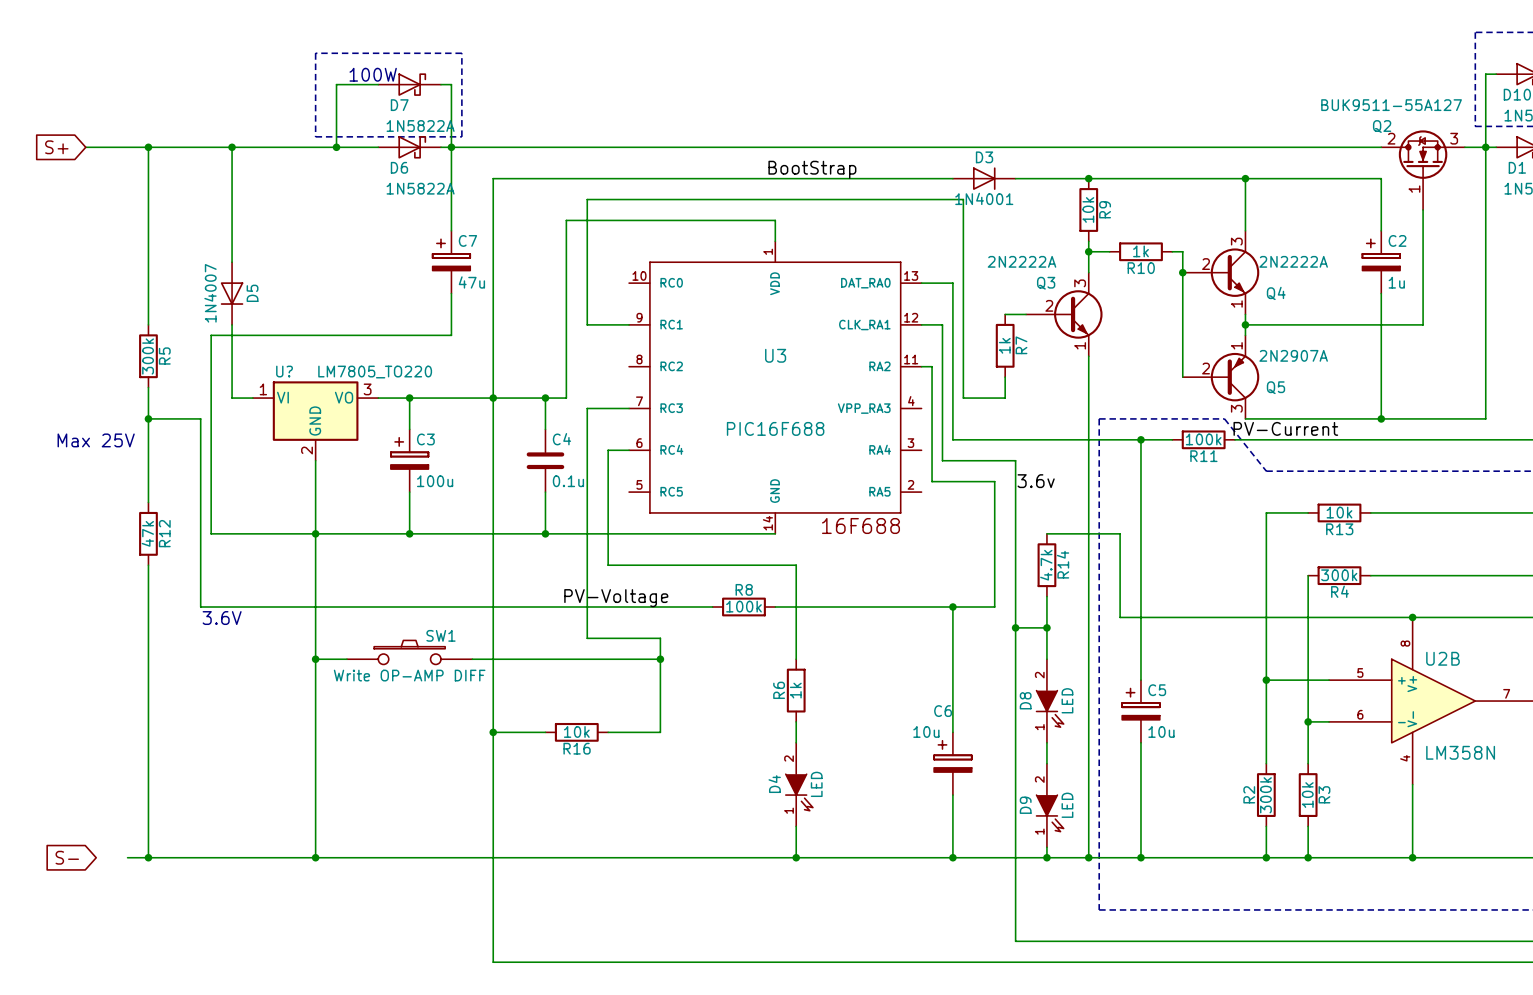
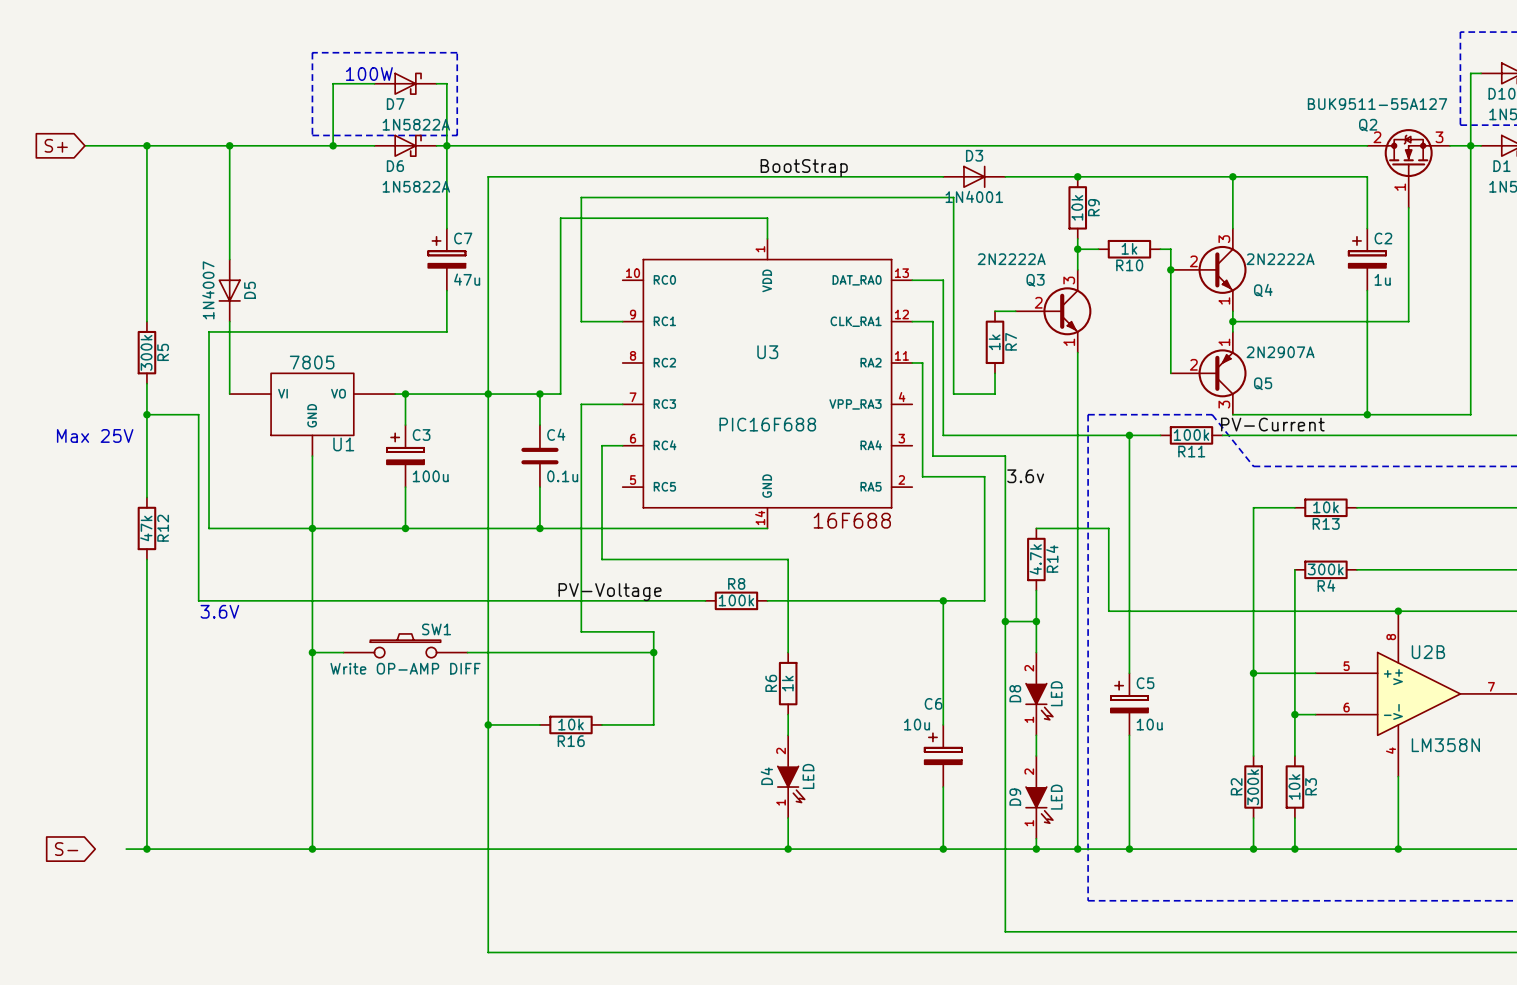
U1: none -> 7805 (312, 414)
U?: LM7805_TO220 (315, 421) -> none

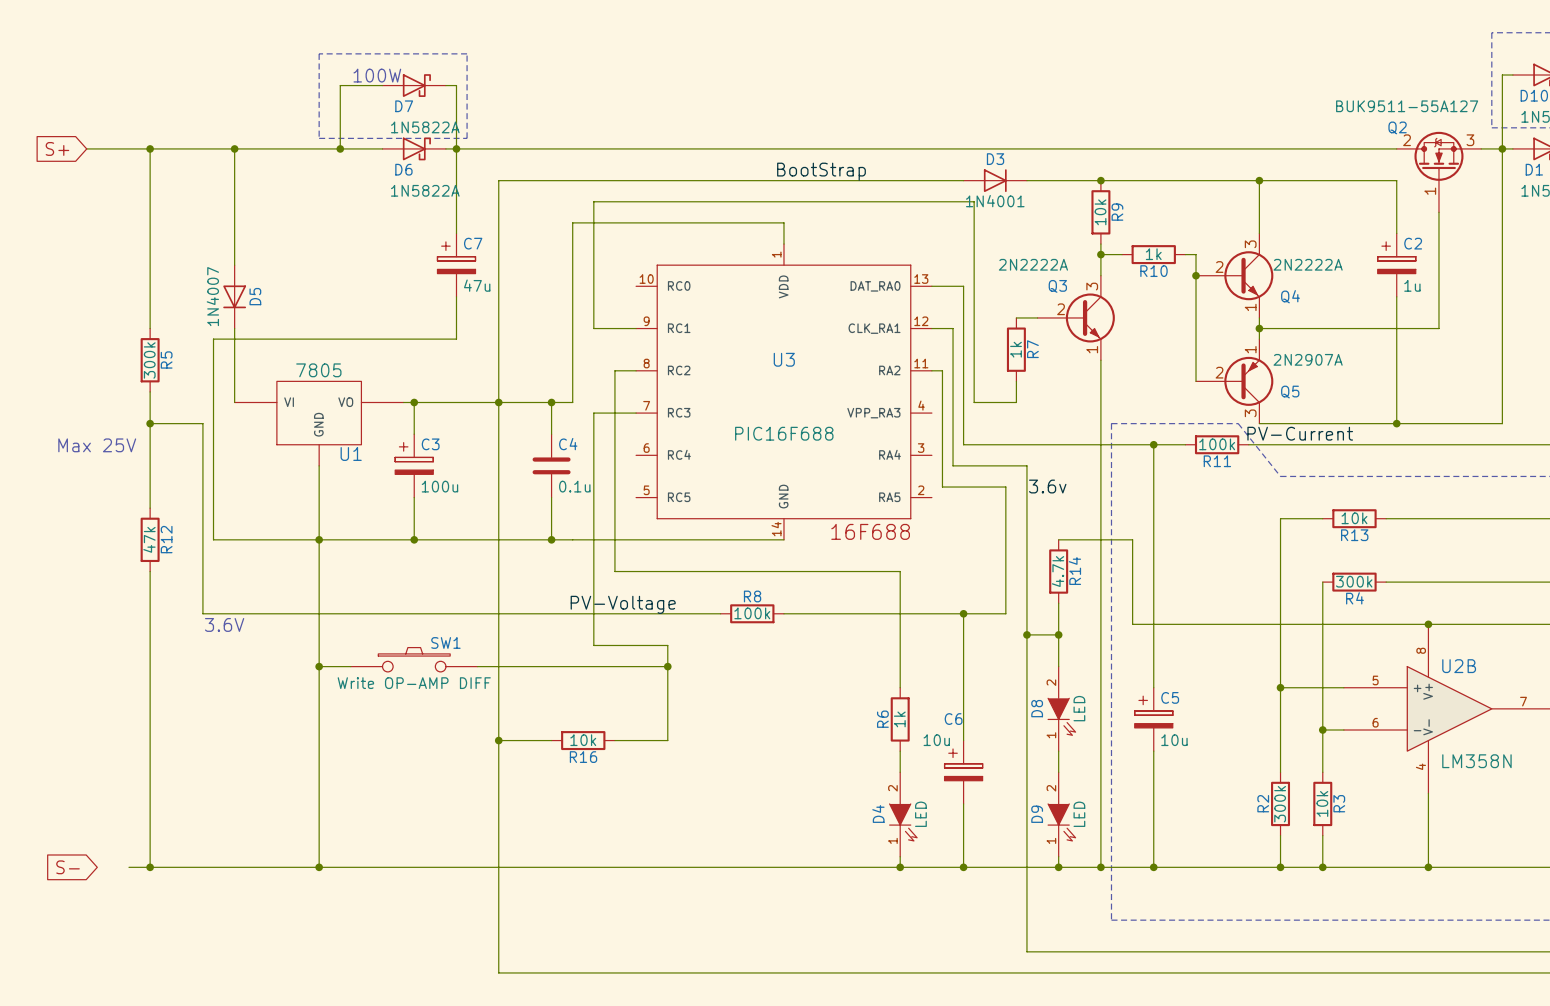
wire: (602, 445) (622, 445) -> (614, 455) (614, 370) (636, 370)
wire: (788, 559) (788, 652) -> (805, 571) (900, 571) (900, 687)
R6 position: (788, 683) -> (900, 719)
wire: (788, 714) (788, 735) -> (900, 751) (900, 772)
D4 position: (791, 776) -> (903, 814)
wire: (788, 818) (788, 849) -> none
wire: none -> (900, 856) (900, 867)
junction: (788, 849) -> none
junction: none -> (900, 867)

